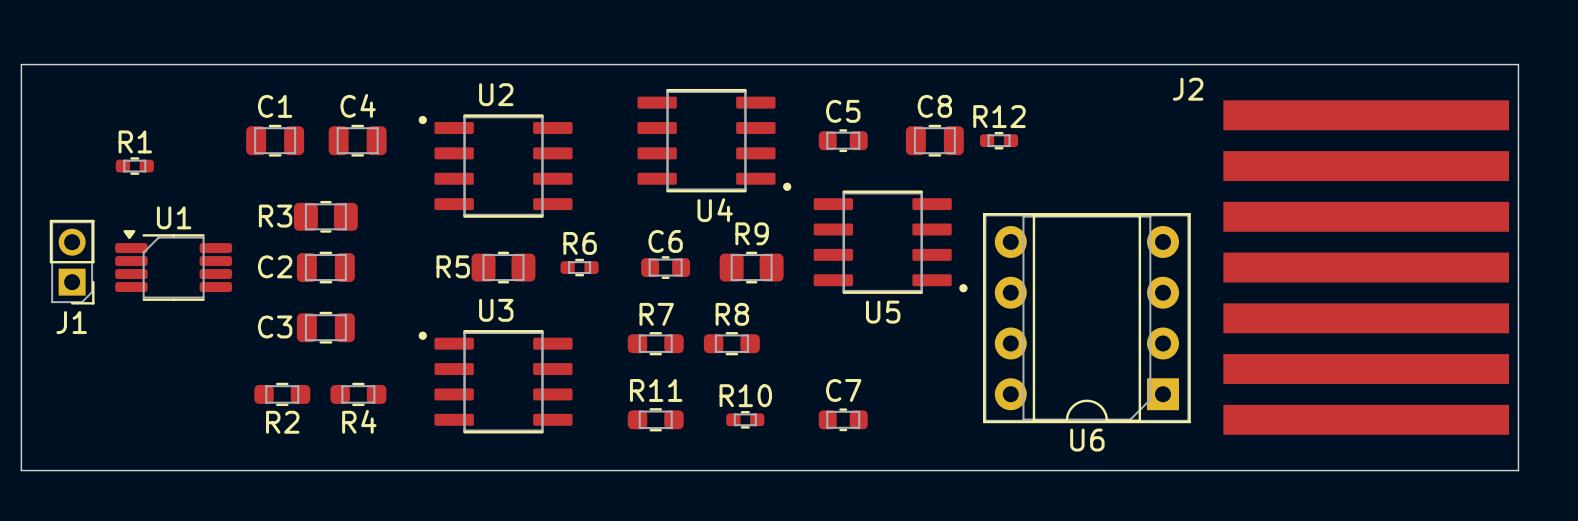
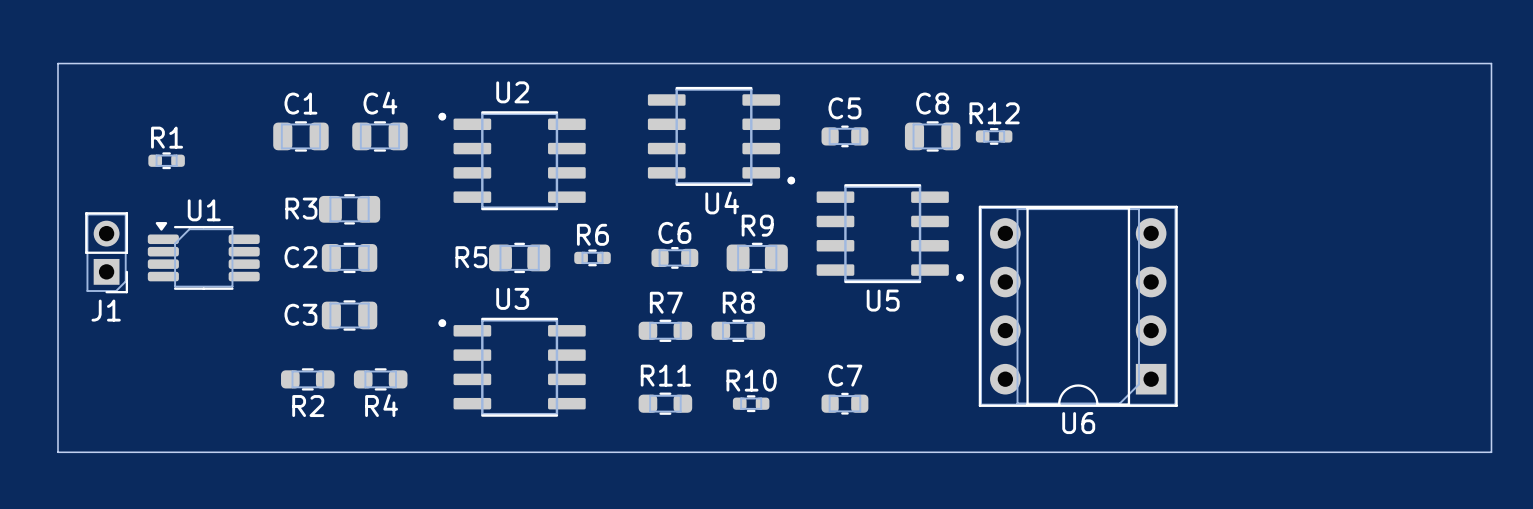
J2: (1366, 267) -> none

